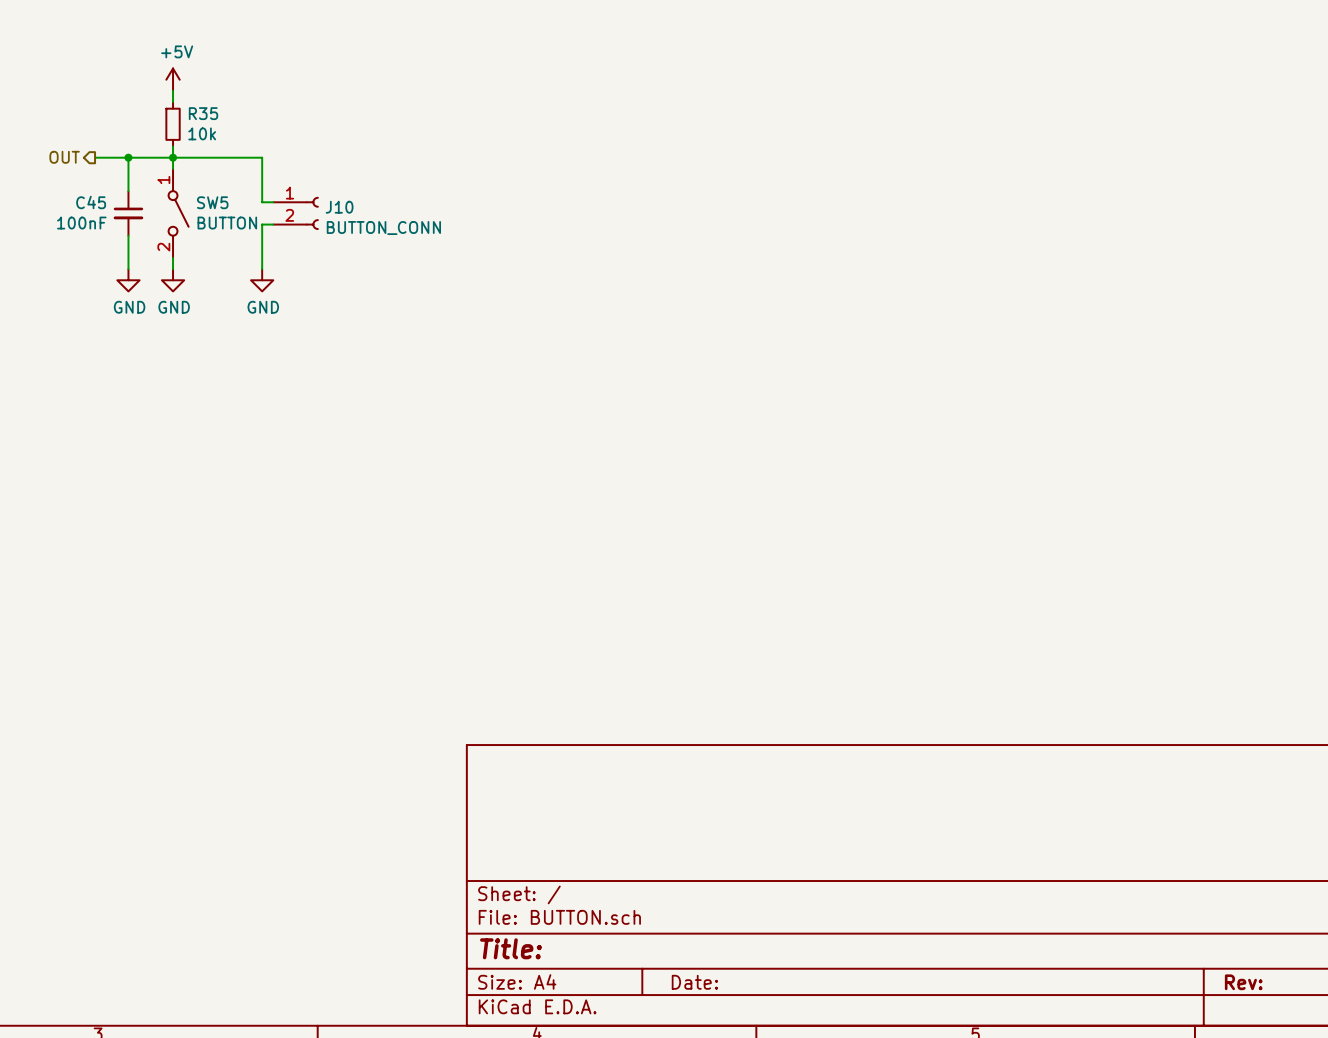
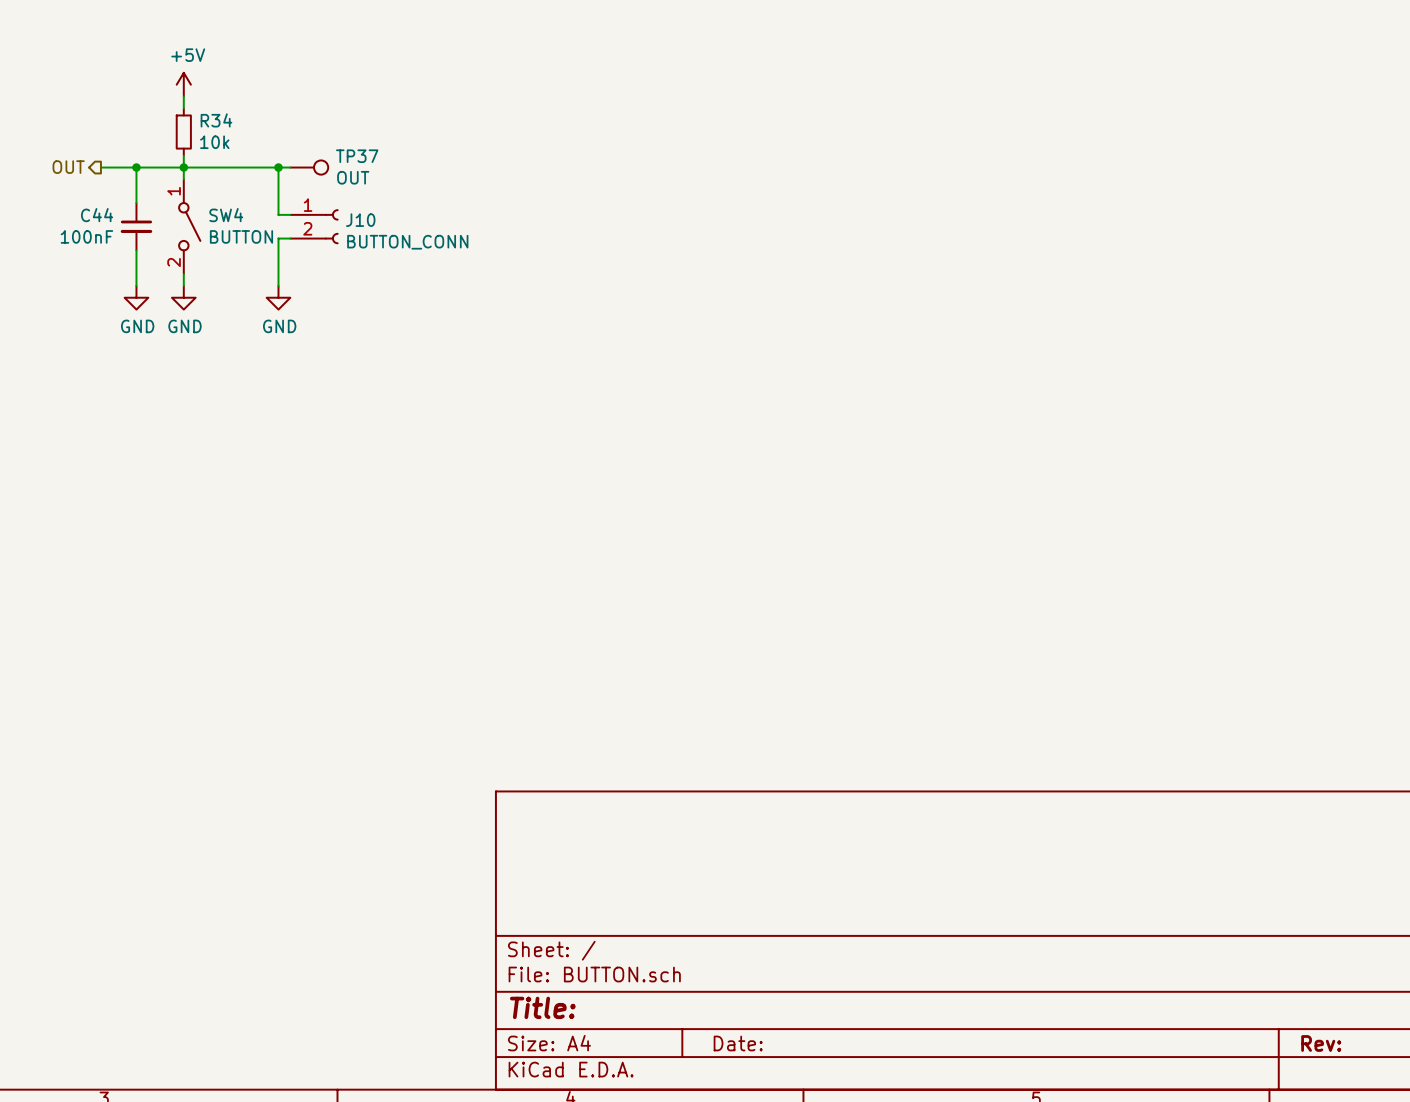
R35 name: R35 (203, 113) -> R34 (216, 120)
wire: none -> (278, 167) (290, 167)
junction: none -> (278, 167)
TP37: none -> OUT (309, 167)
C45 name: C45 (91, 202) -> C44 (97, 215)
SW5 name: SW5 (212, 202) -> SW4 (226, 215)

